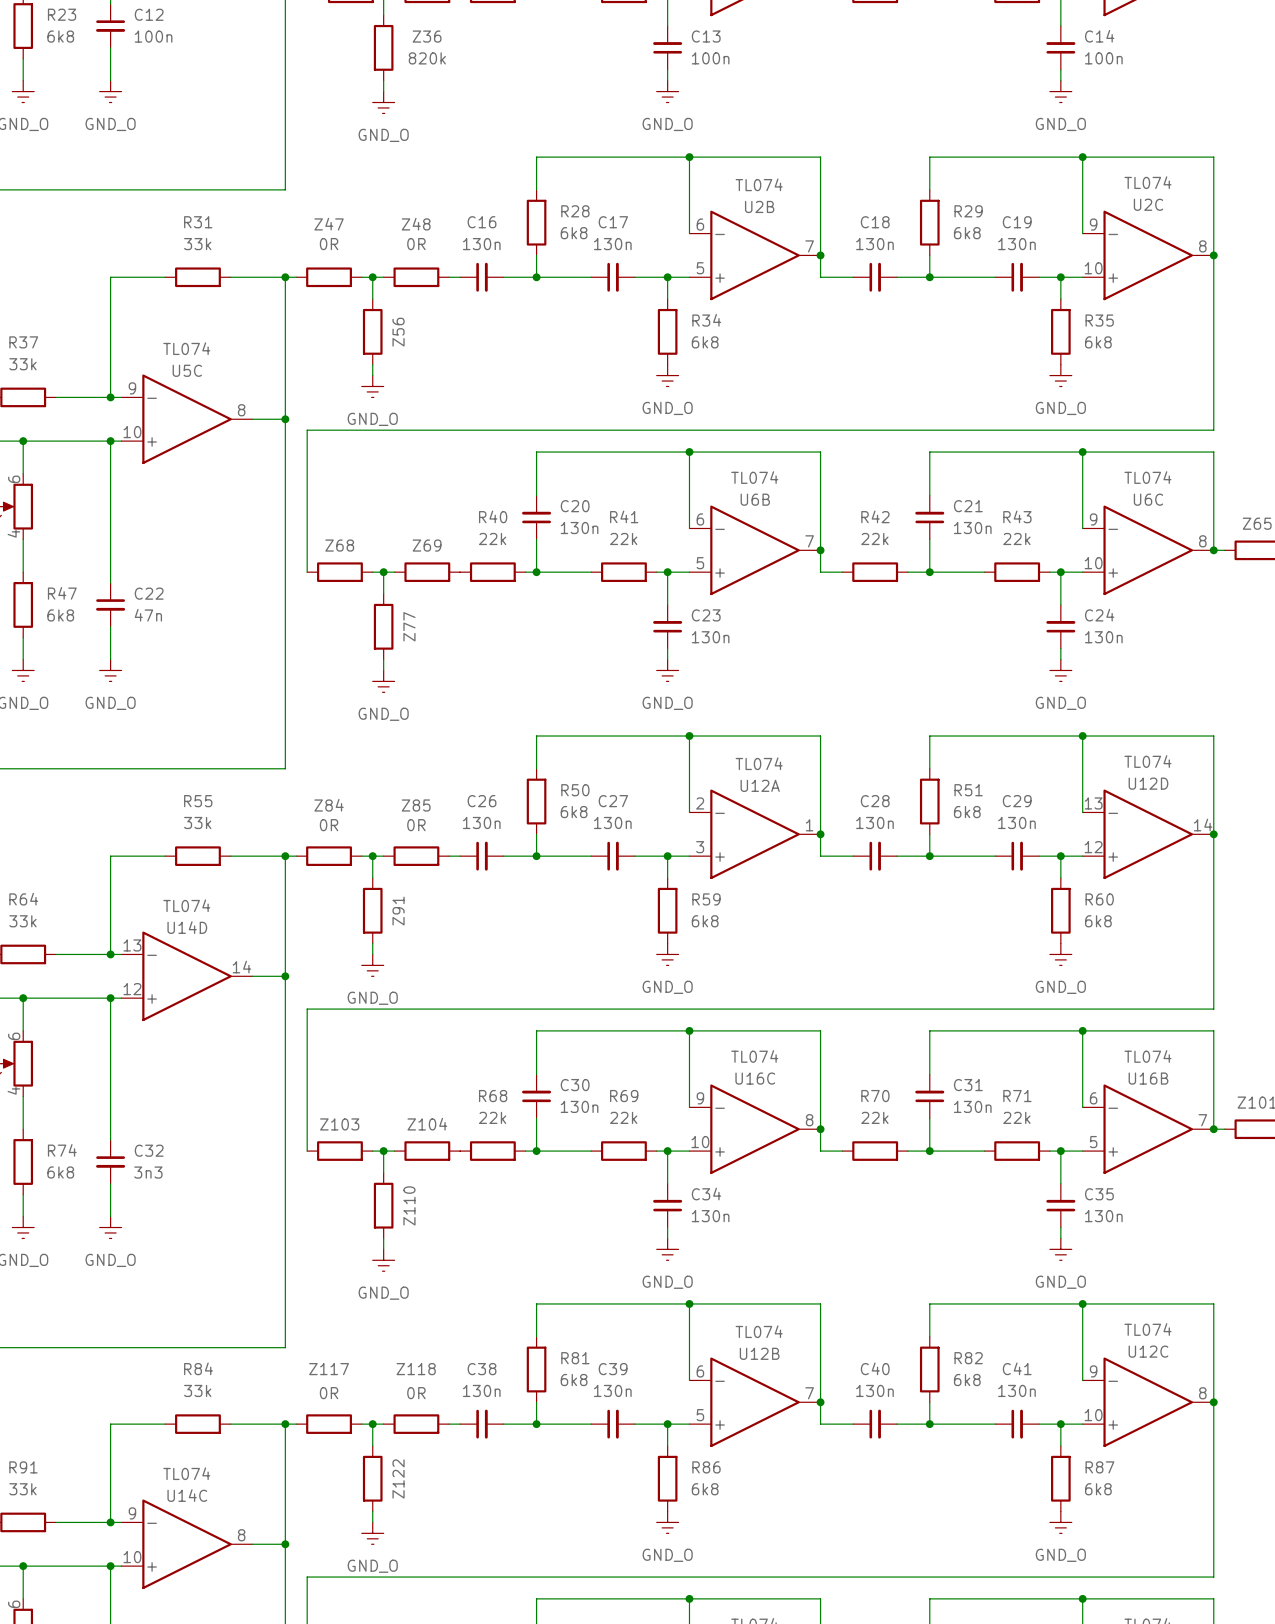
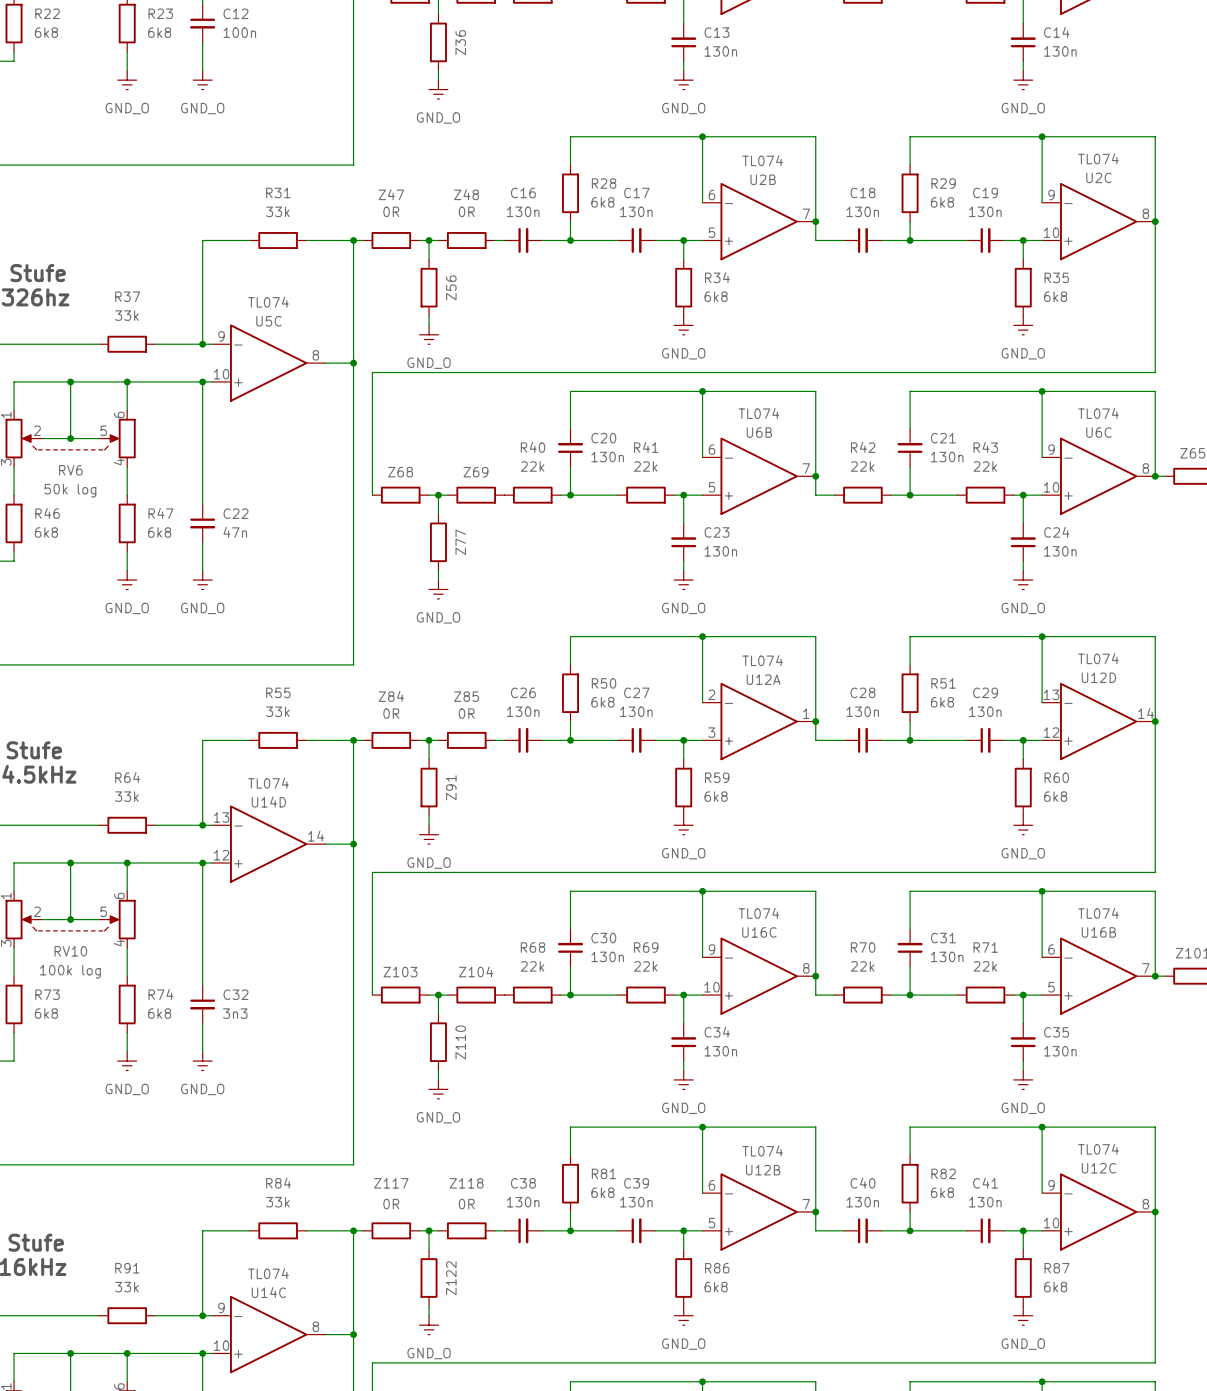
Z36 name rotation: 0° (427, 36) -> 90° counterclockwise (460, 42)
Z36 value: 820k (427, 58) -> none
C13 value: 100n (710, 58) -> 130n (720, 51)
C14 value: 100n (1103, 58) -> 130n (1060, 51)

